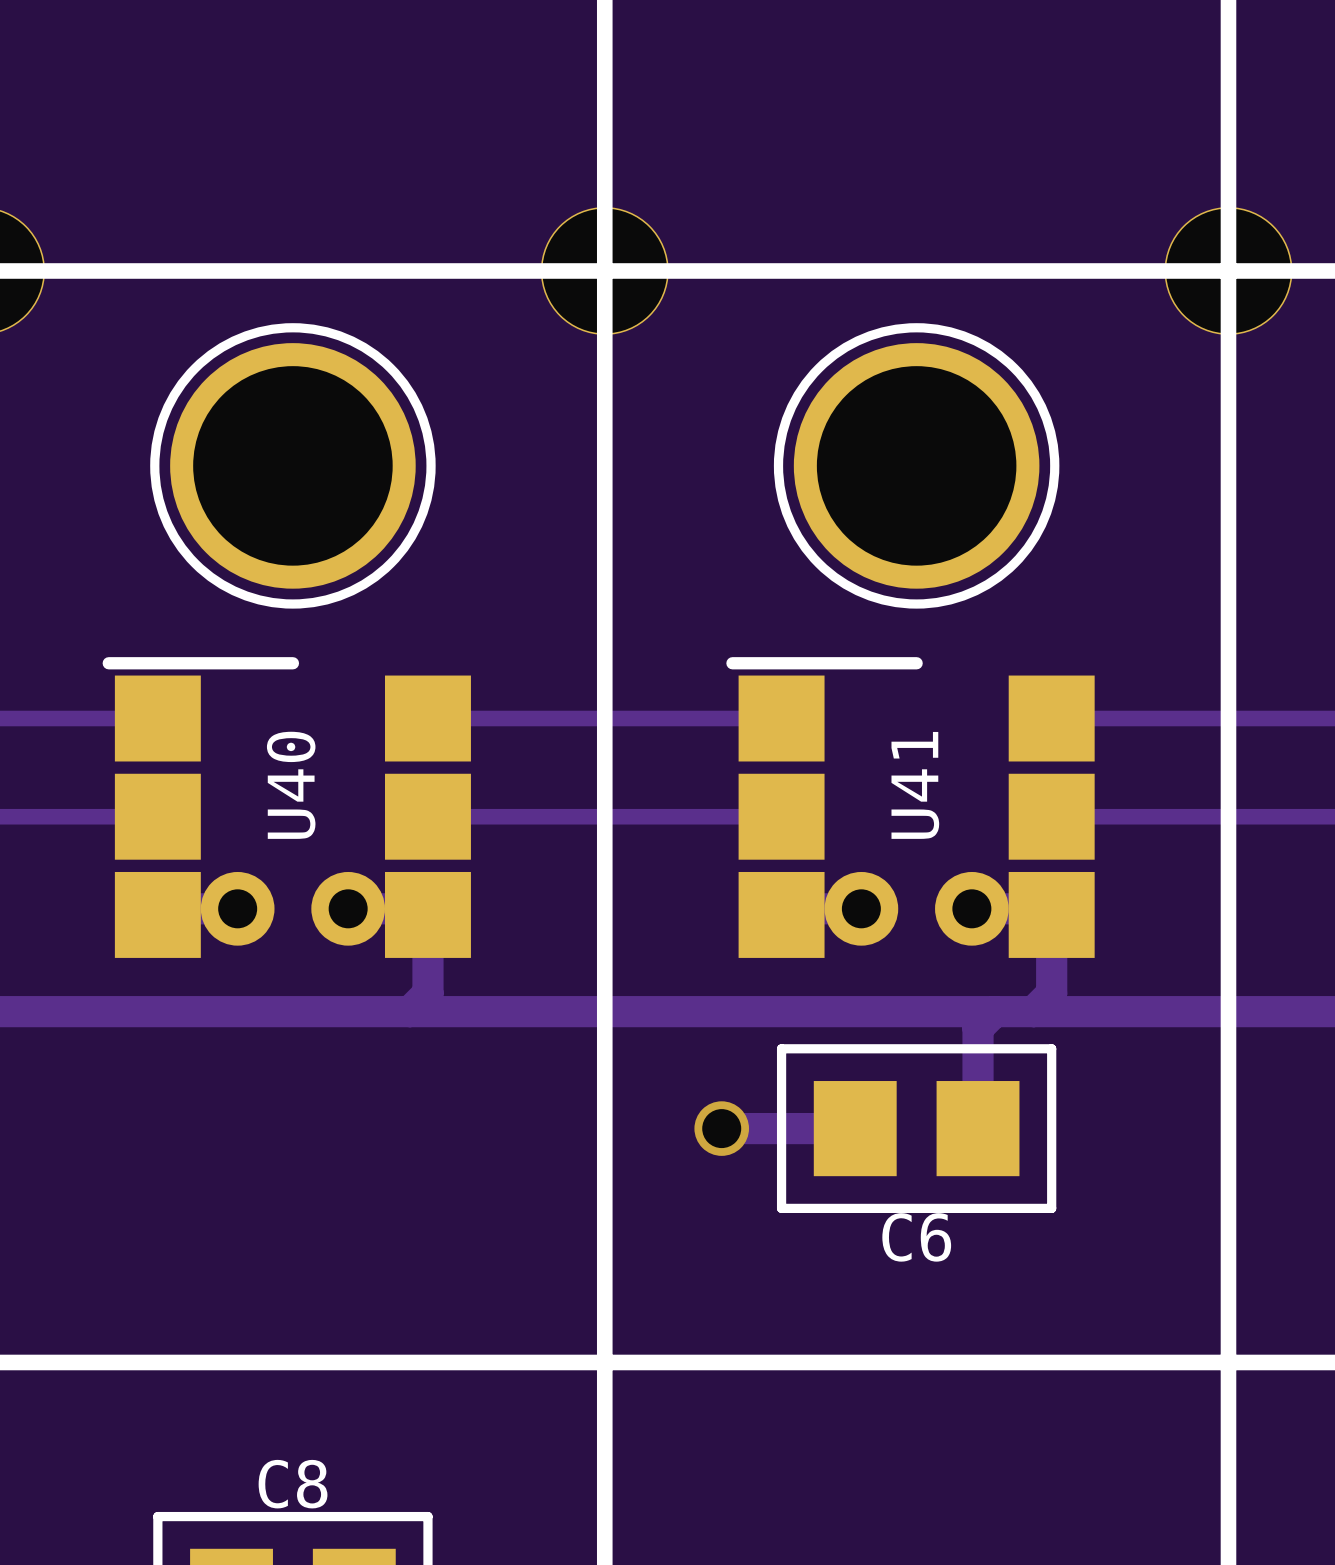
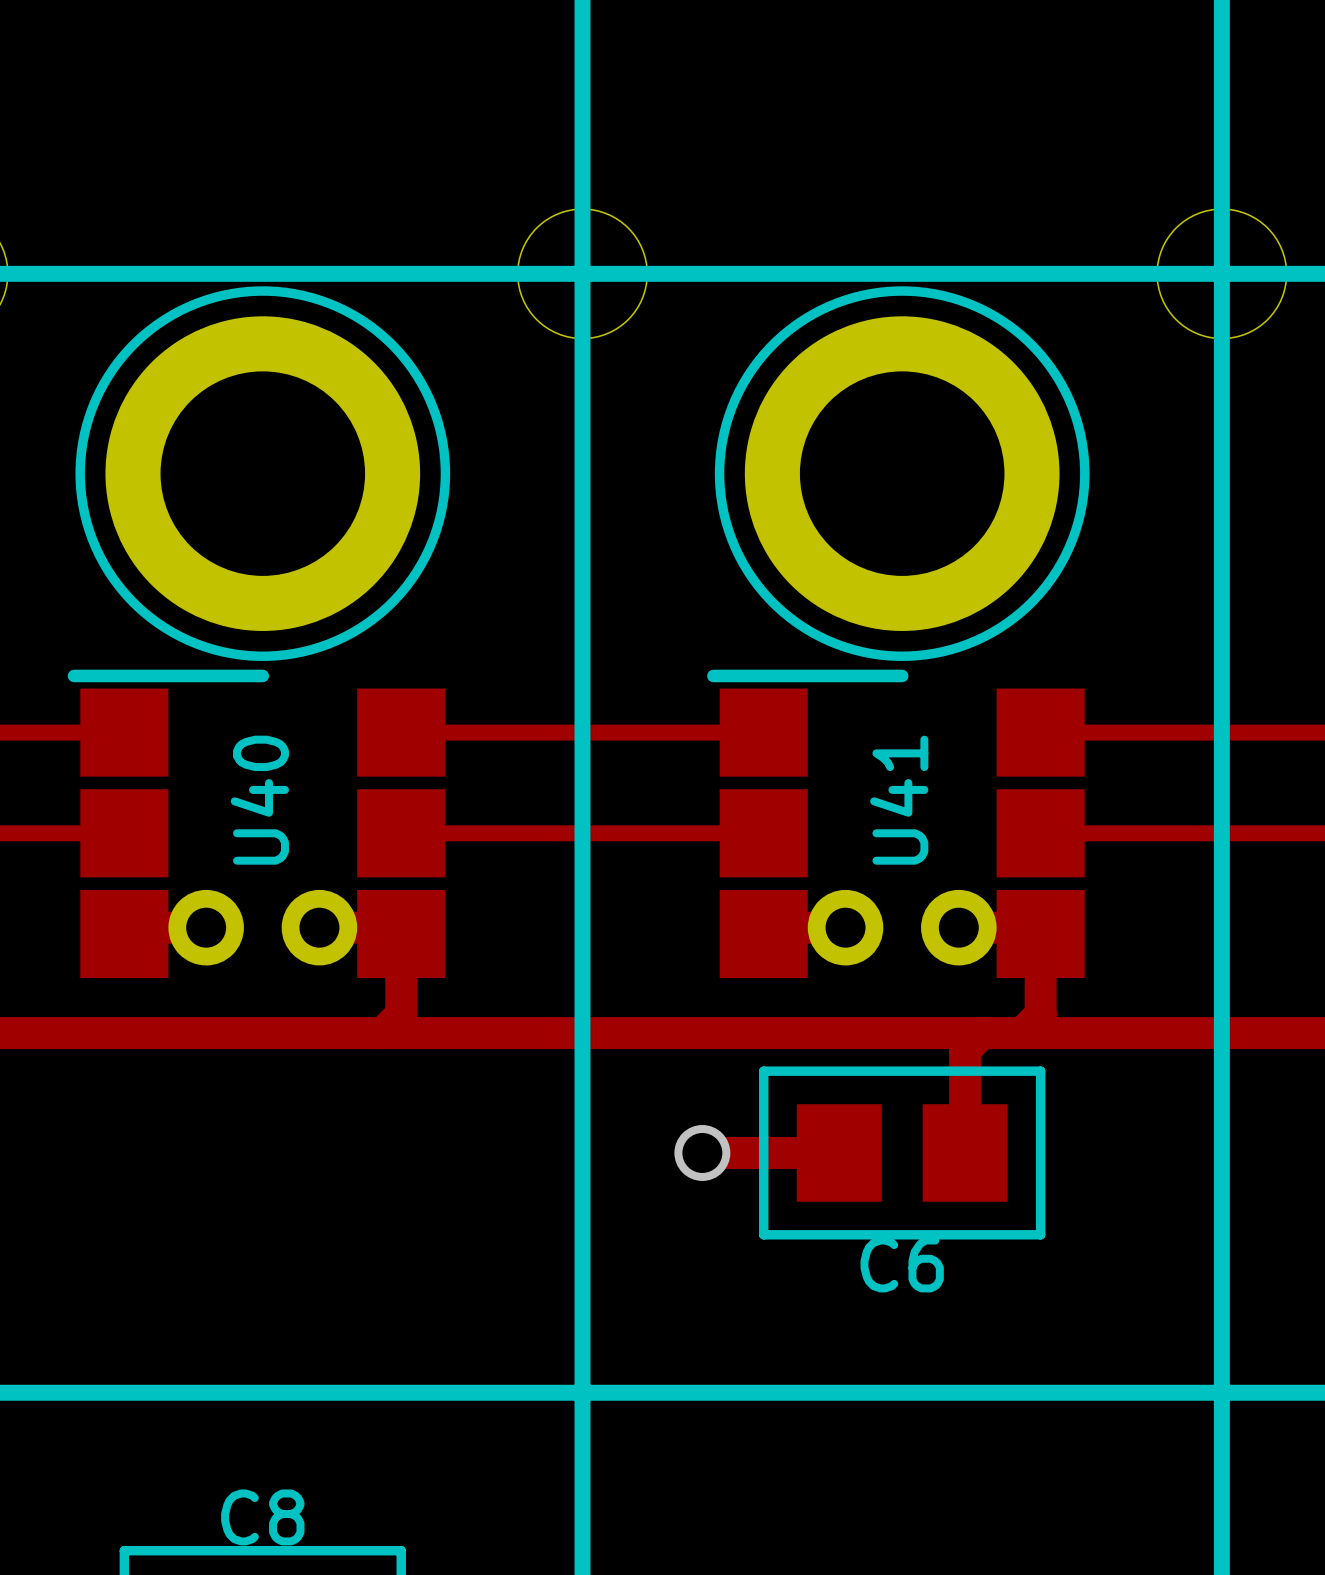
part footprint: [150, 323, 436, 609] -> [75, 286, 451, 661]
part footprint: [773, 323, 1060, 609] -> [714, 286, 1090, 661]

